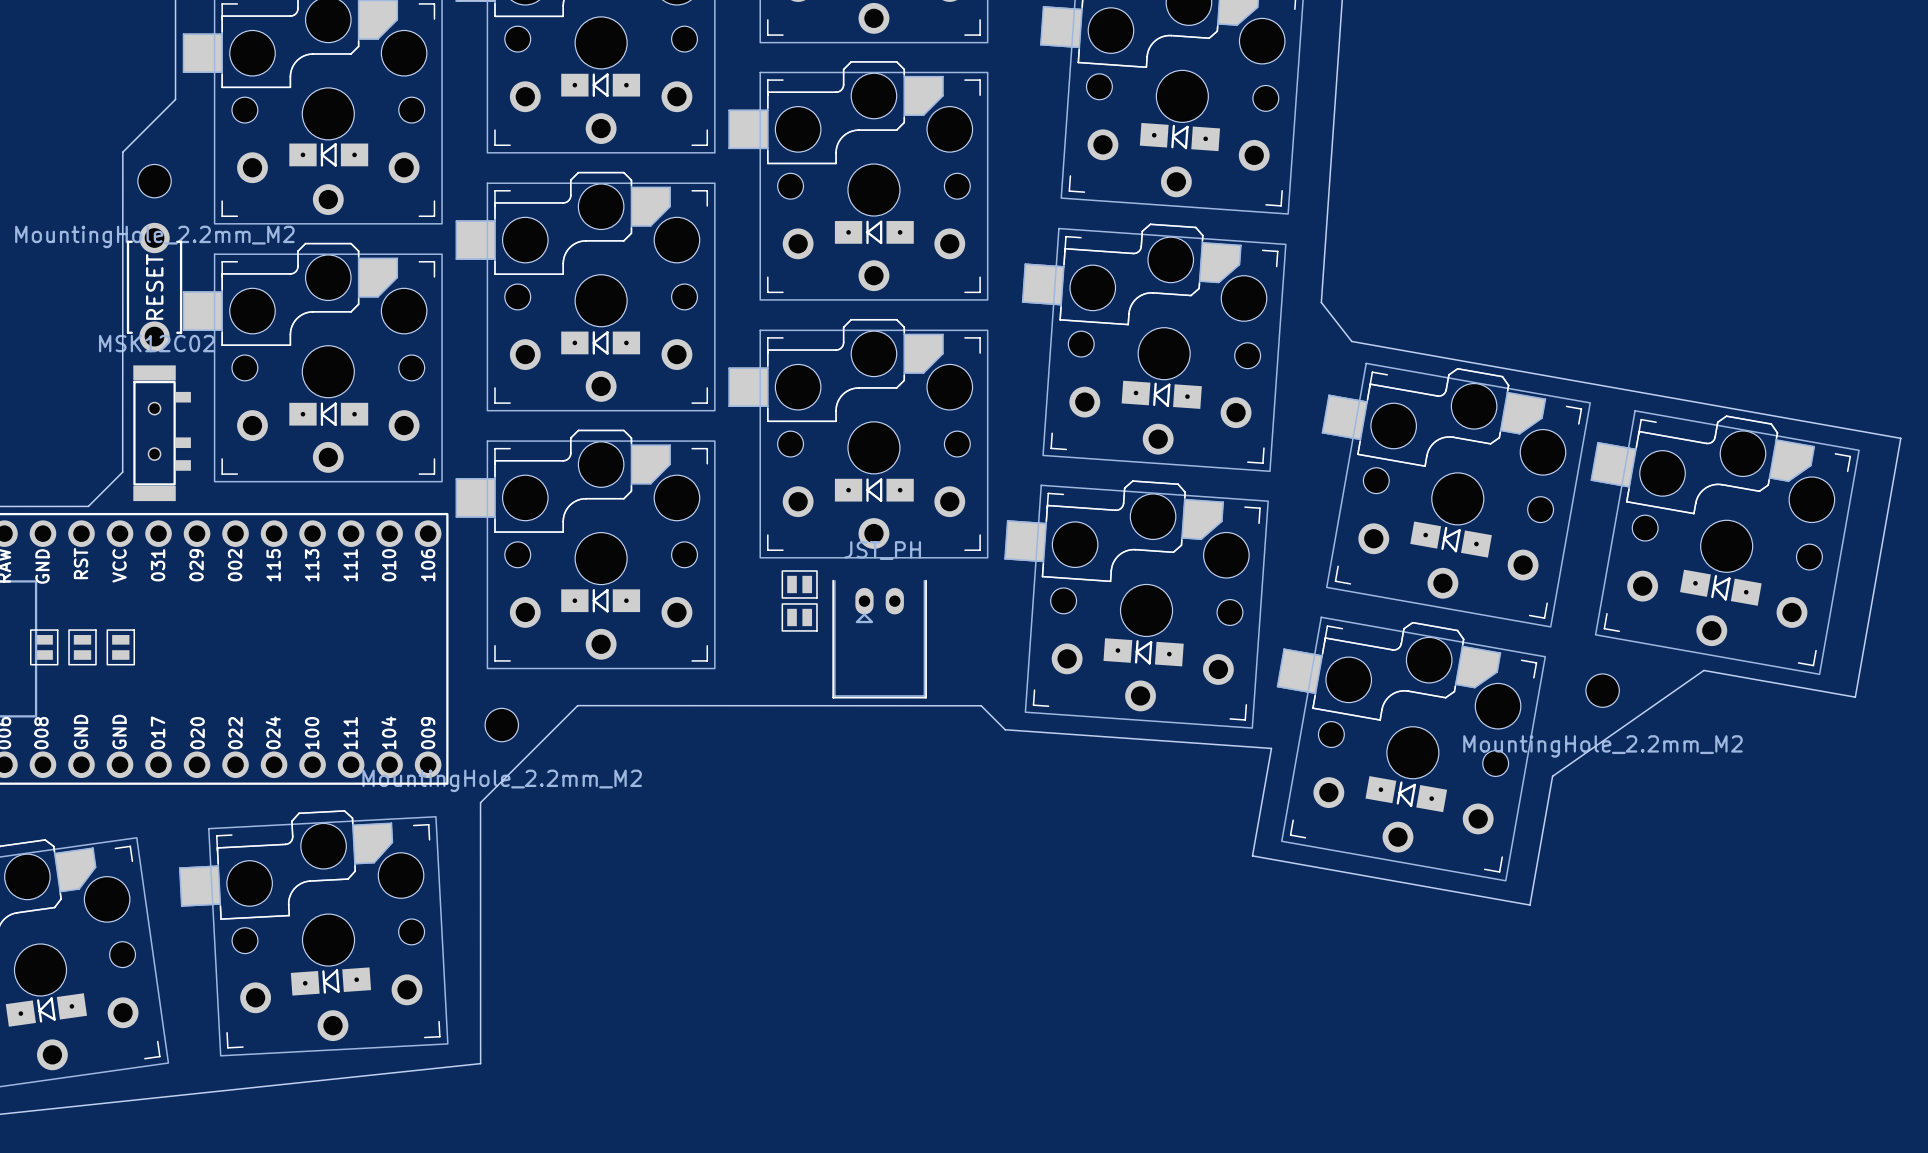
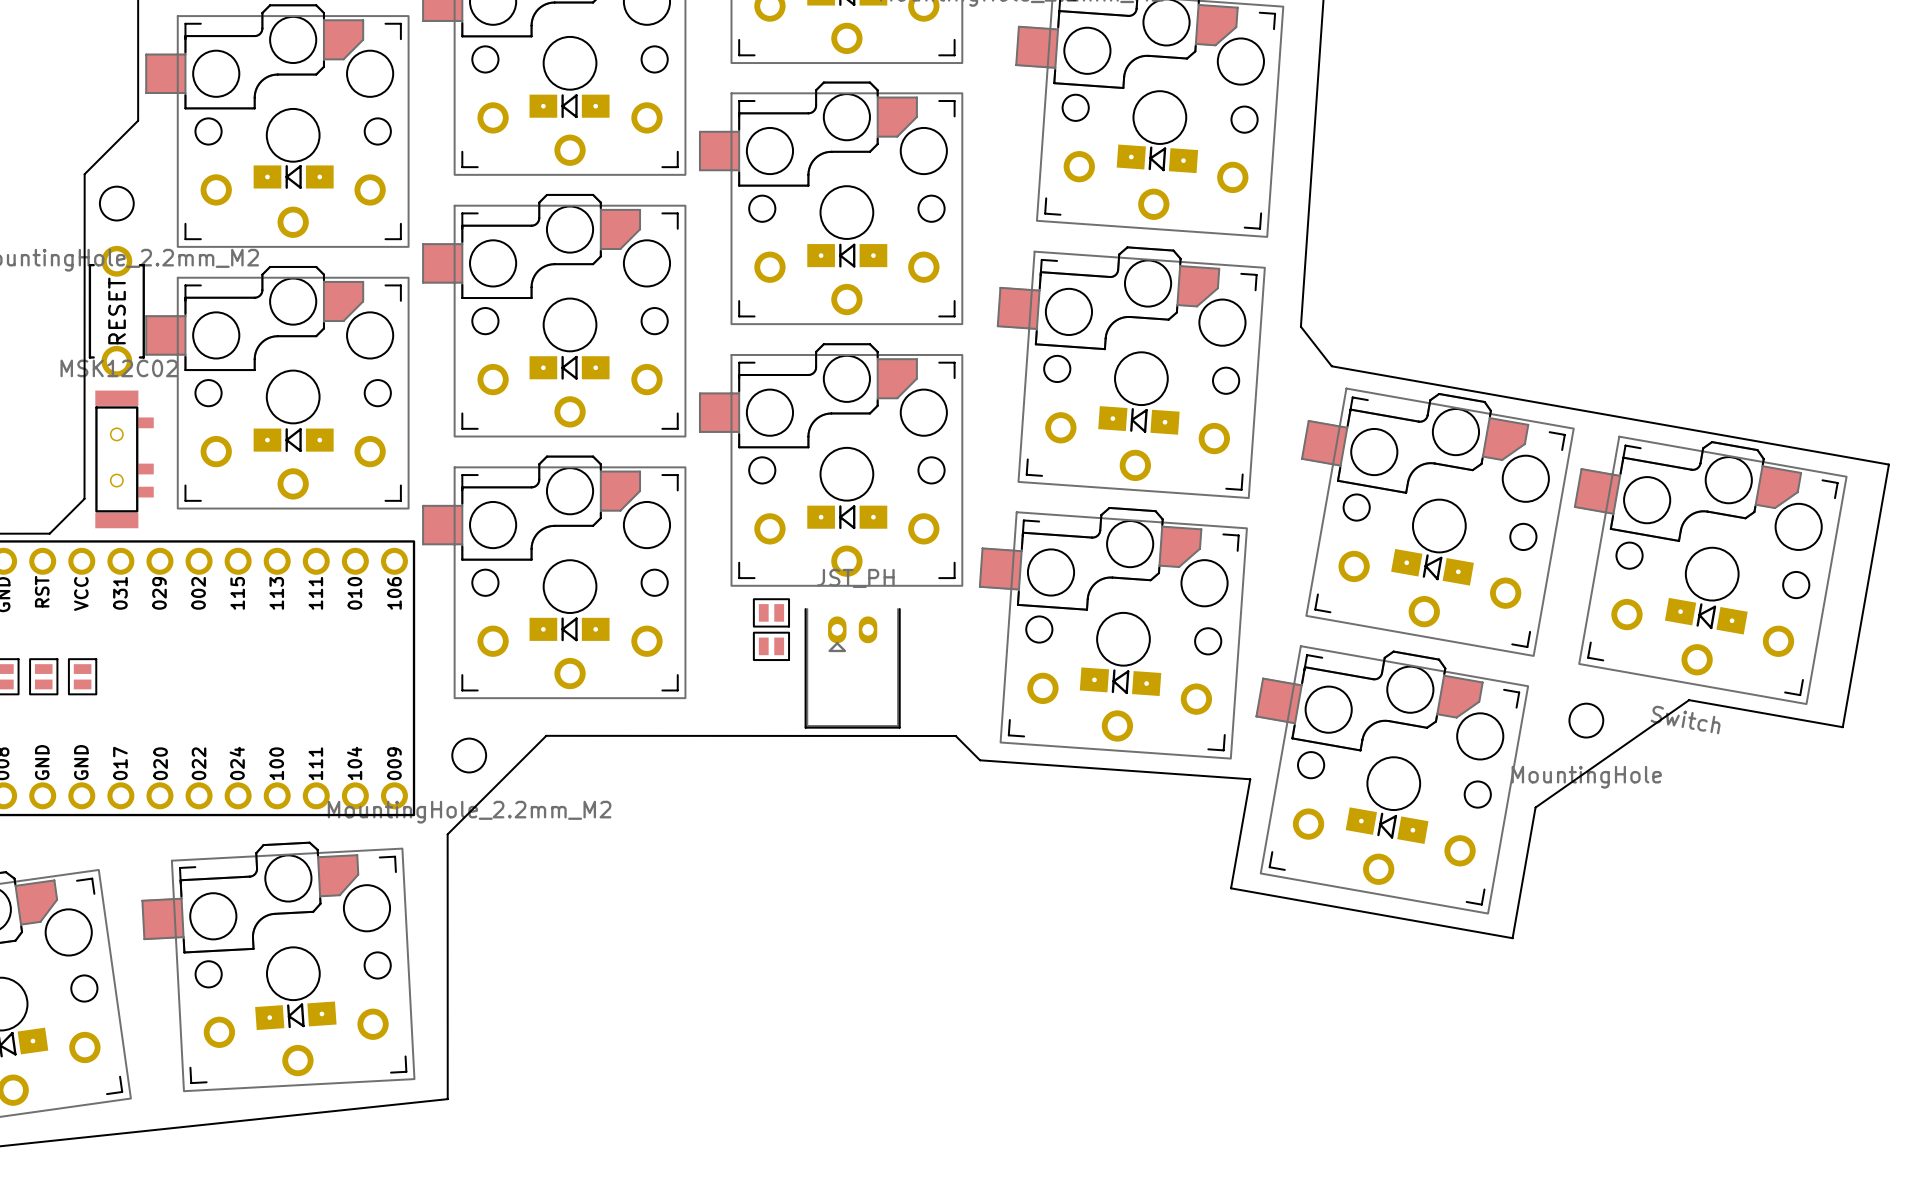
part value: none -> Switch (1685, 720)
part value: MountingHole_2.2mm_M2 (1602, 746) -> MountingHole (1586, 777)

